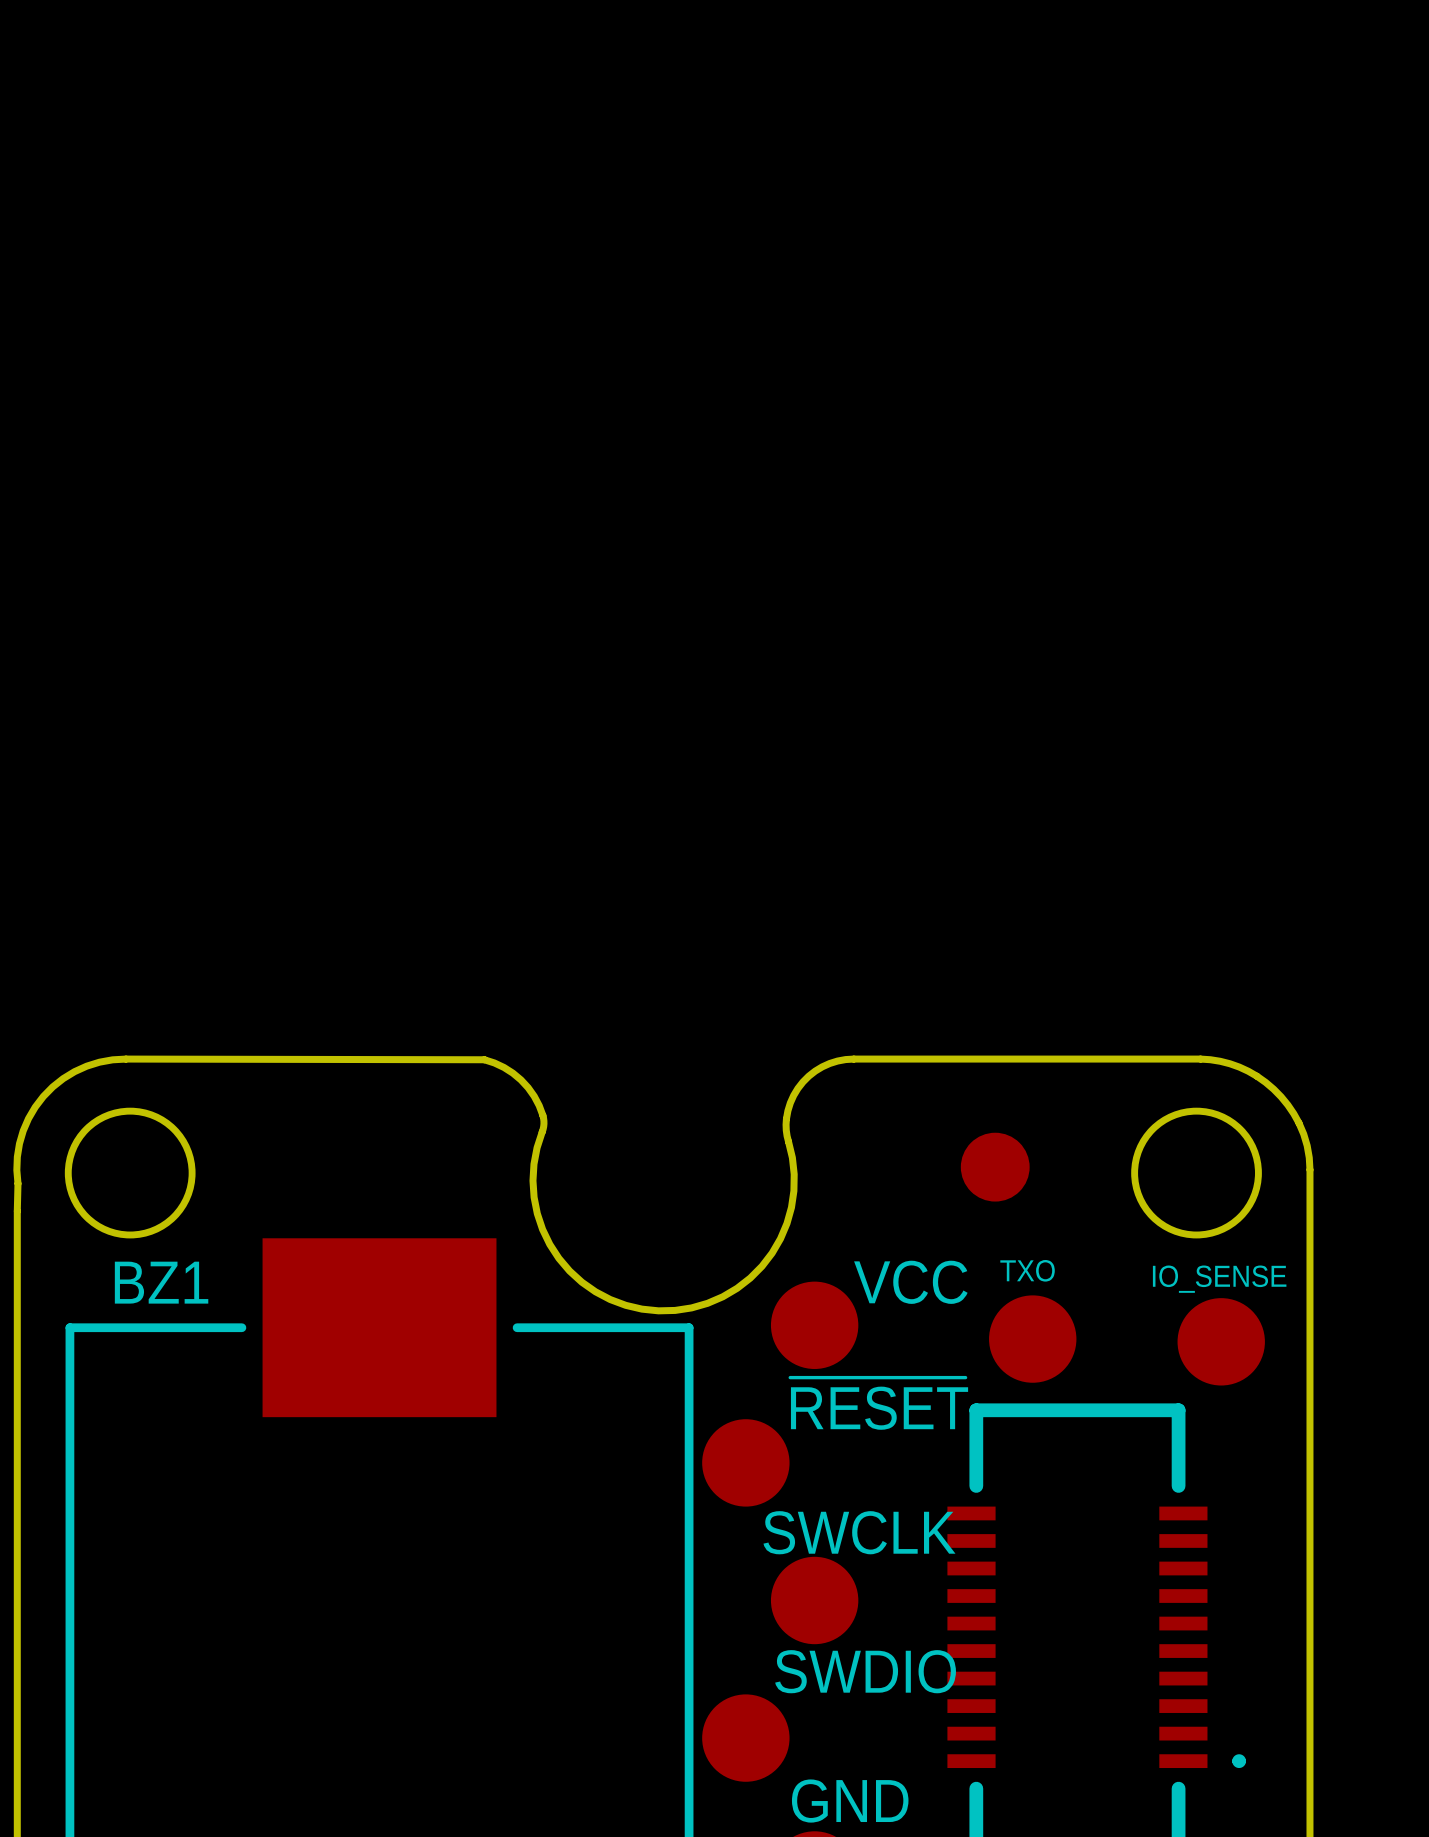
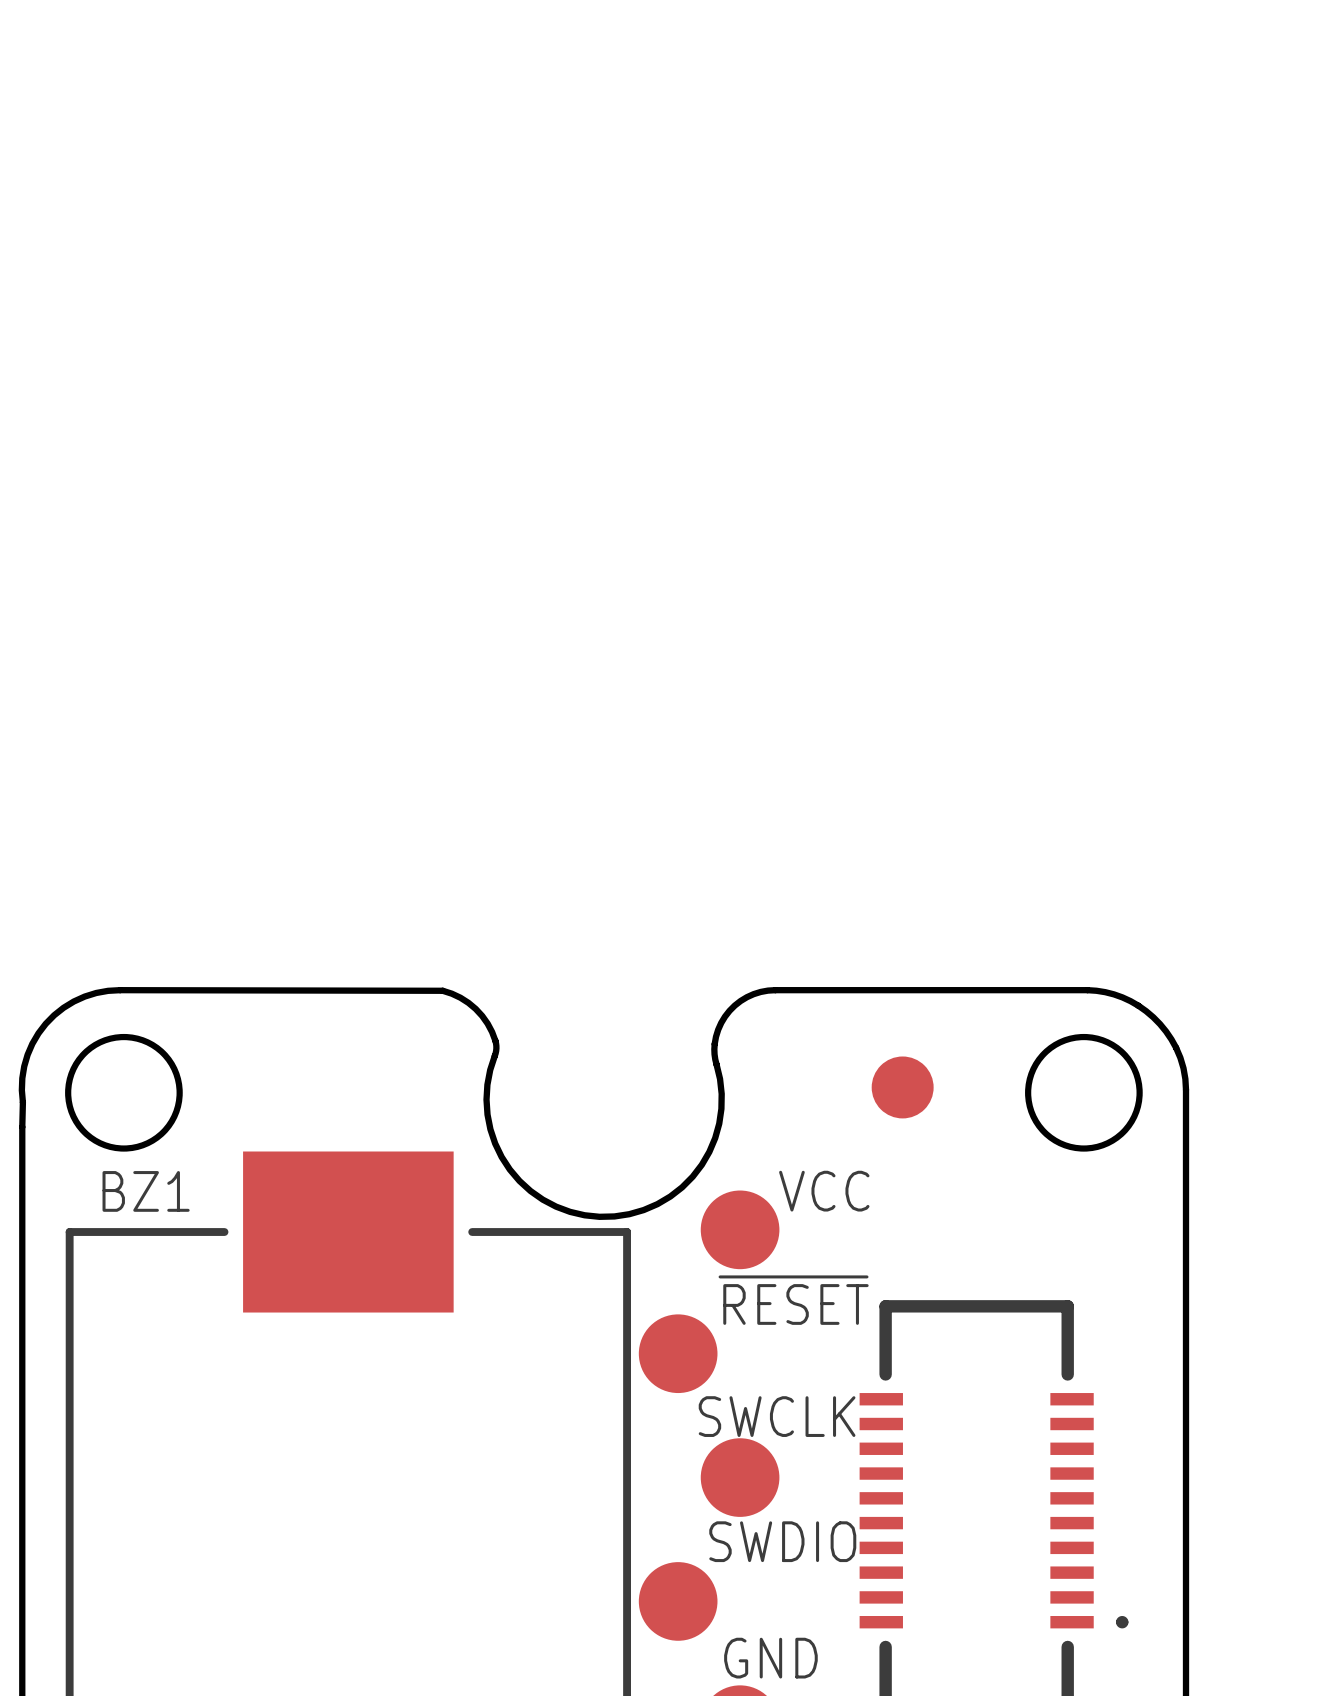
text: TXO (1027, 1270) -> none
text: IO_SENSE (1219, 1279) -> none
part: (1032, 1339) -> none
part: (1221, 1341) -> none

